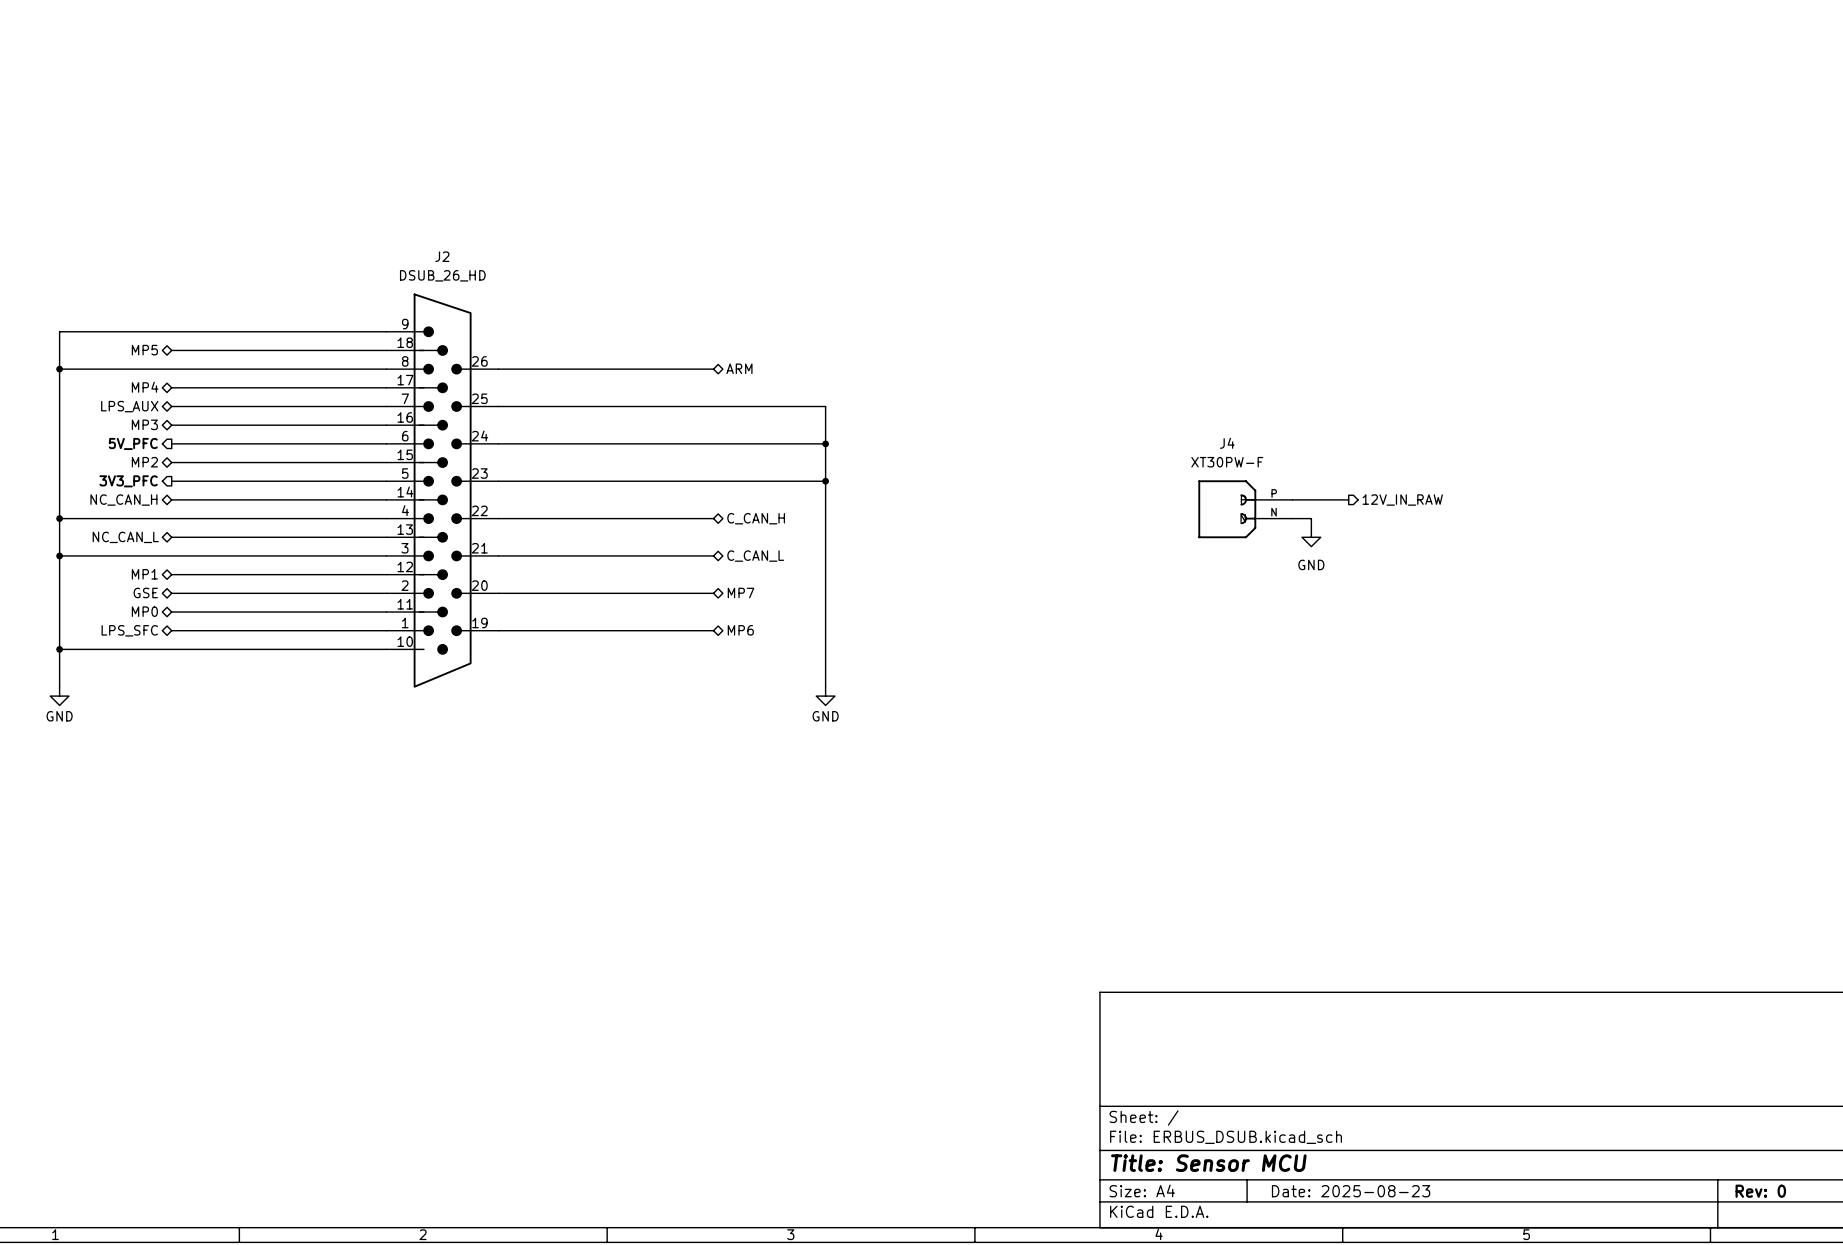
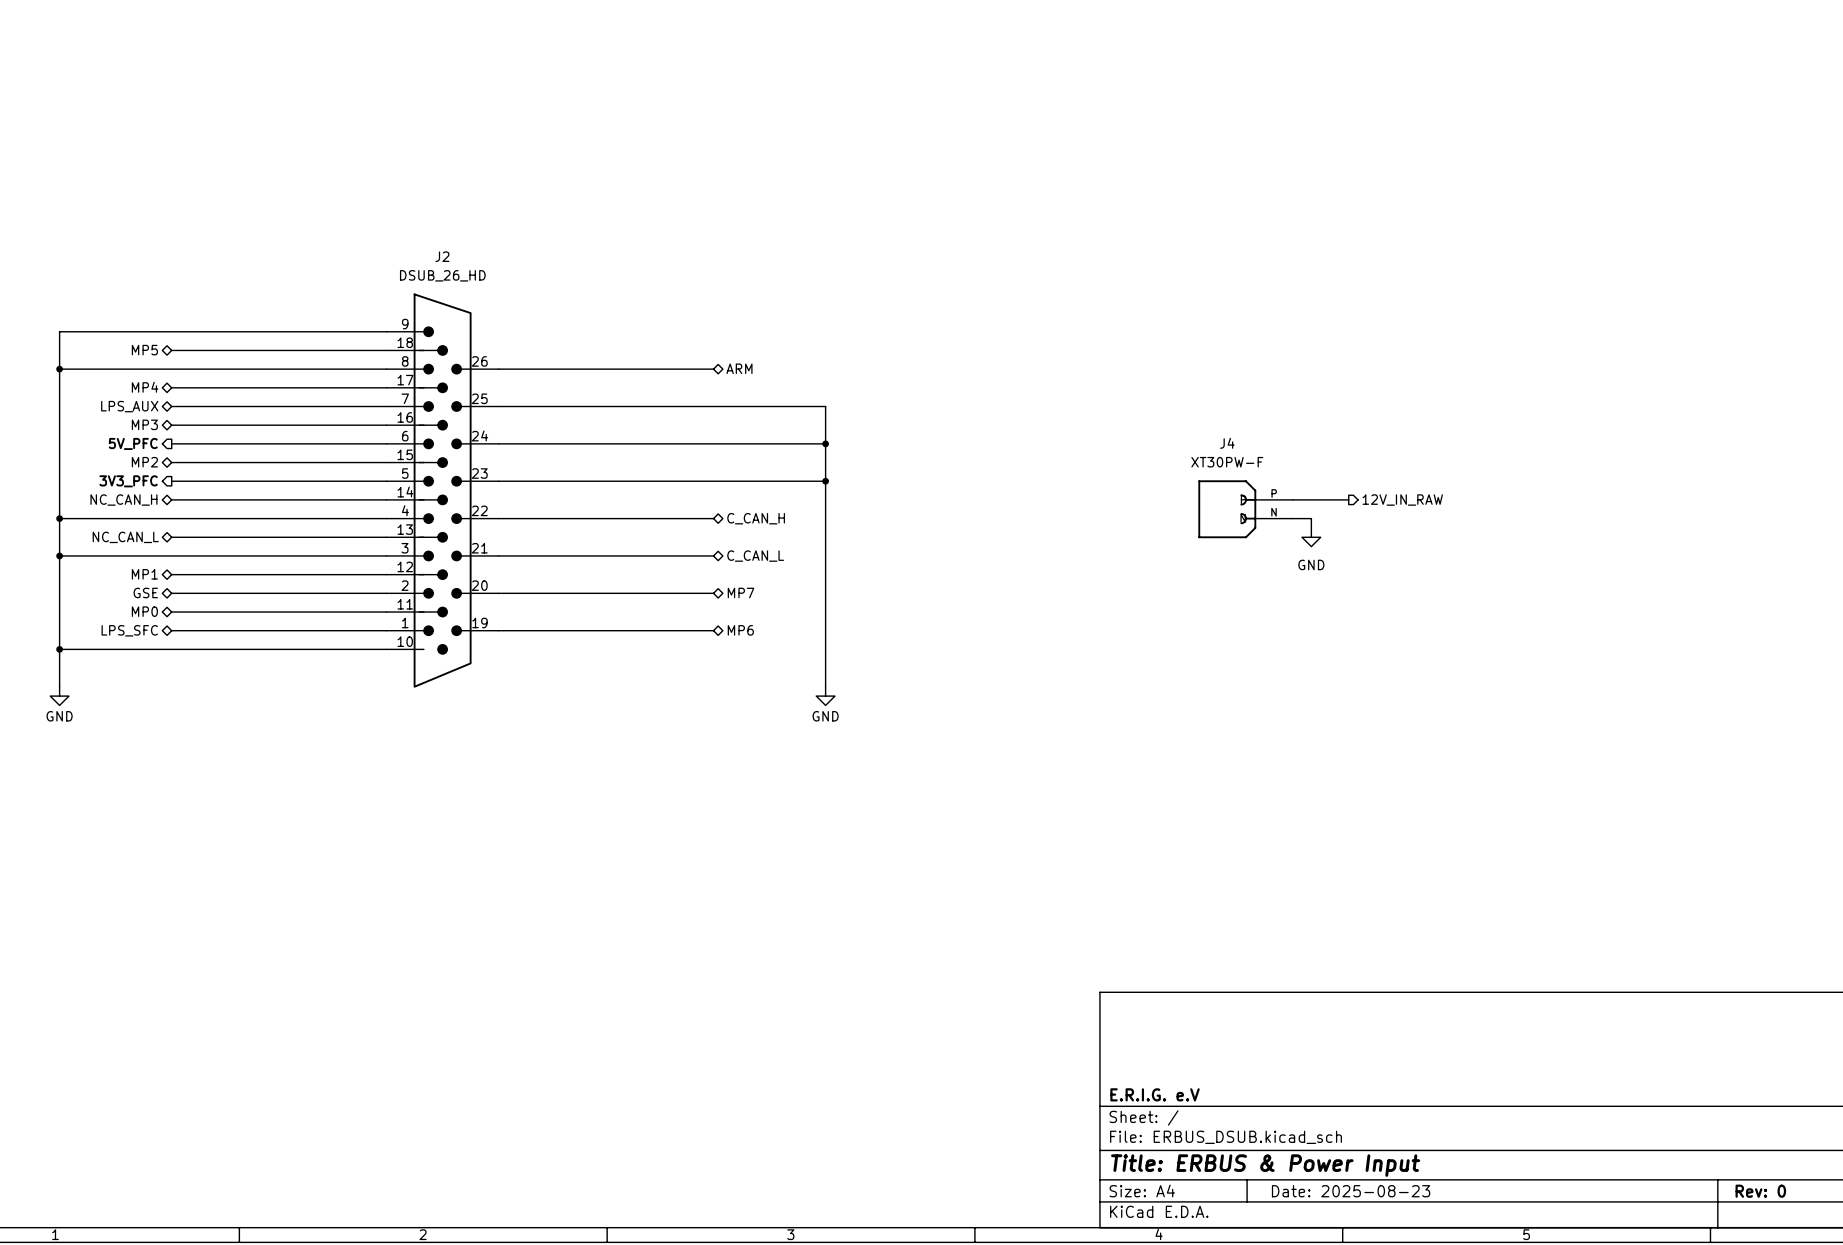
title block: none -> E.R.I.G. e.V (1155, 1094)
title block: Title: Sensor MCU (1208, 1163) -> Title: ERBUS & Power Input (1265, 1165)

